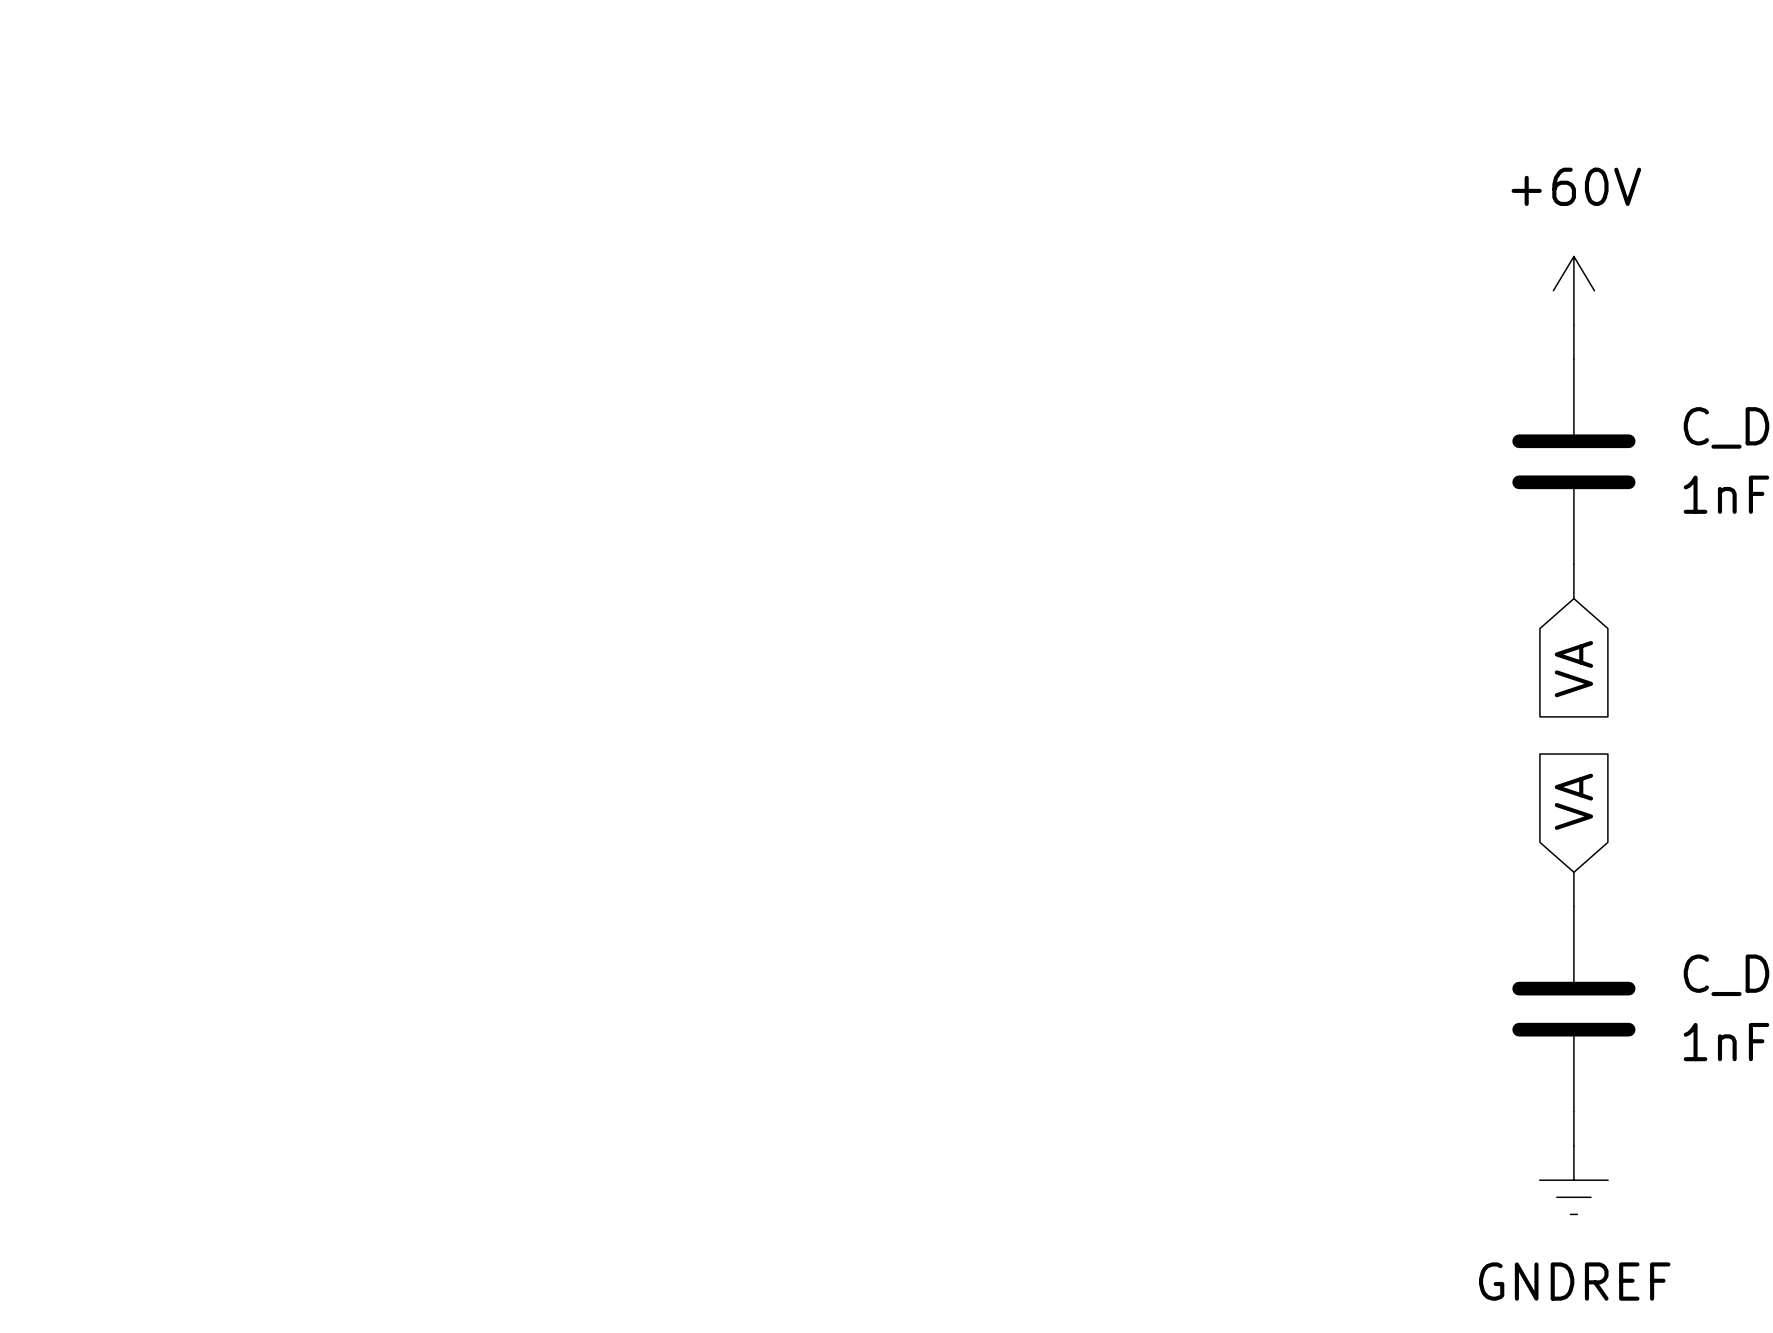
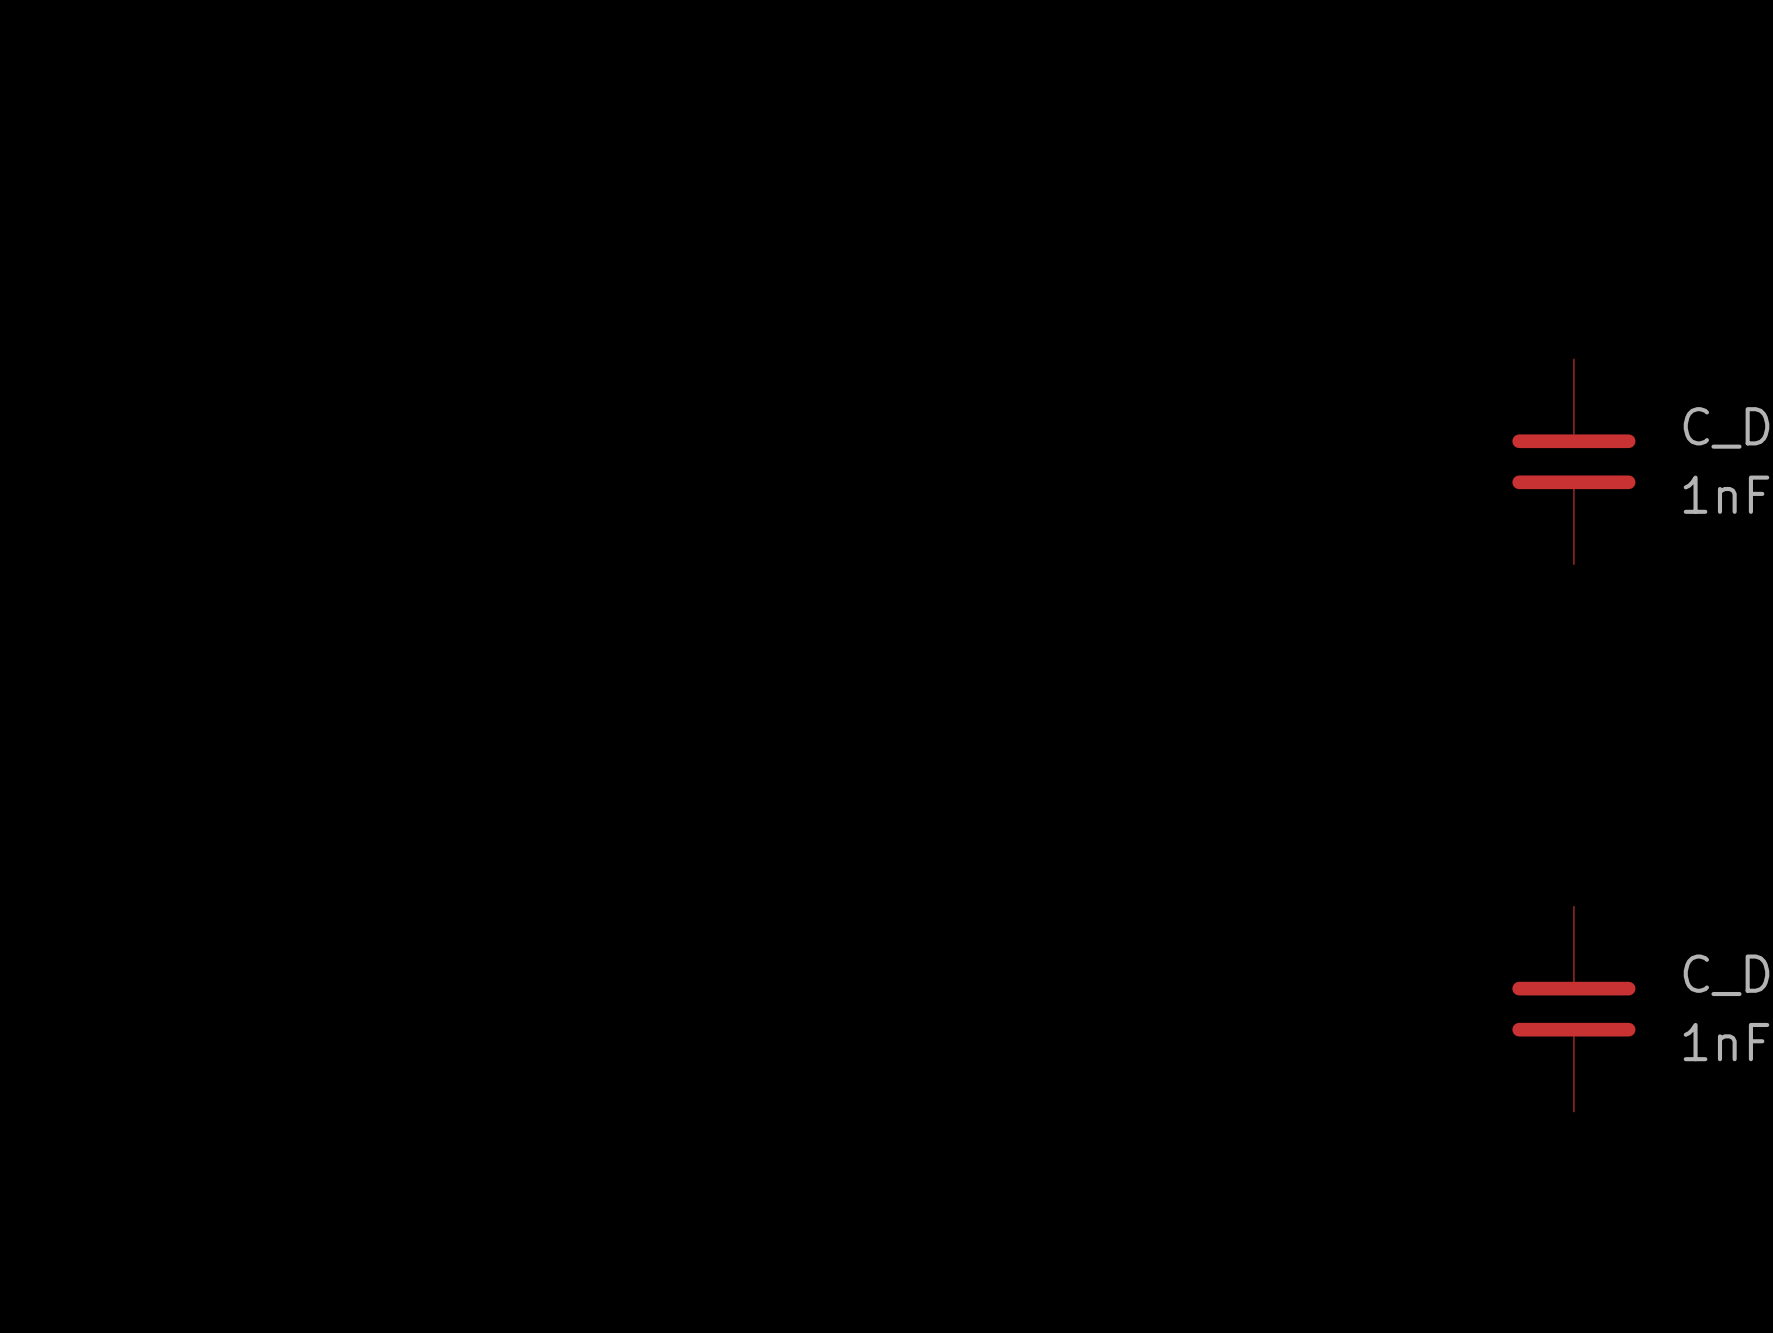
power symbol: +60V (1573, 290) -> none
wire: (1573, 324) (1573, 359) -> none
wire: (1573, 564) (1573, 598) -> none
global label: VA (1573, 669) -> none
global label: VA (1573, 801) -> none
wire: (1573, 872) (1573, 906) -> none
wire: (1573, 1111) (1573, 1145) -> none
power symbol: GNDREF (1573, 1180) -> none

